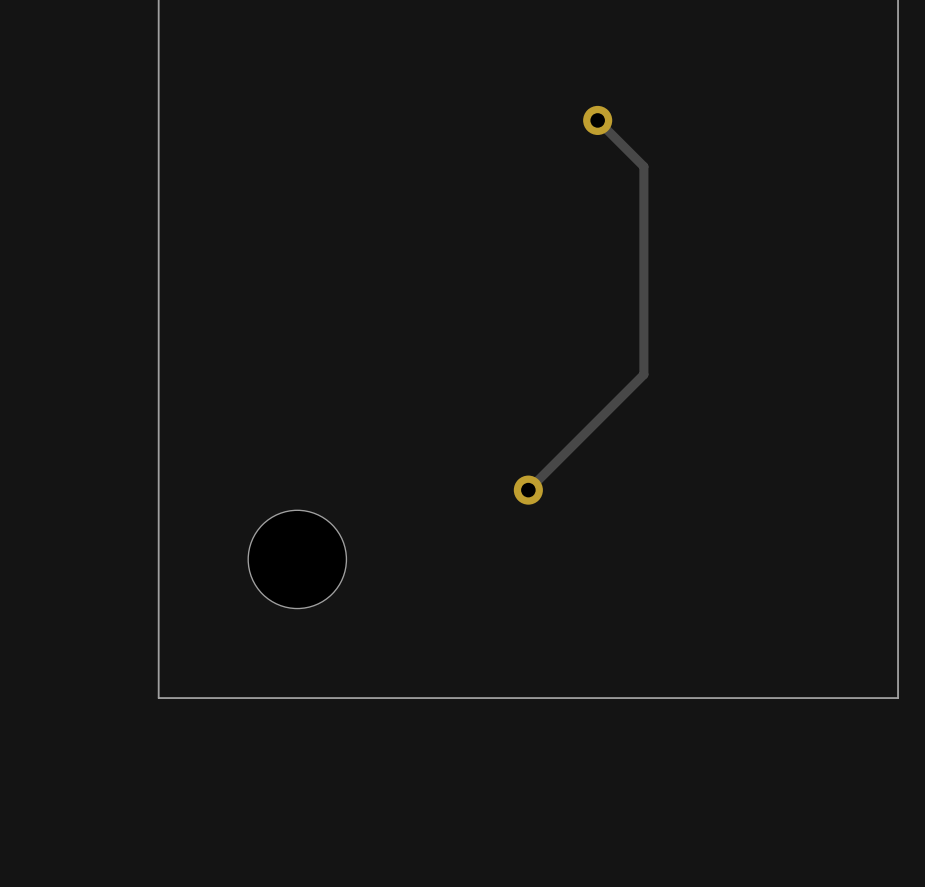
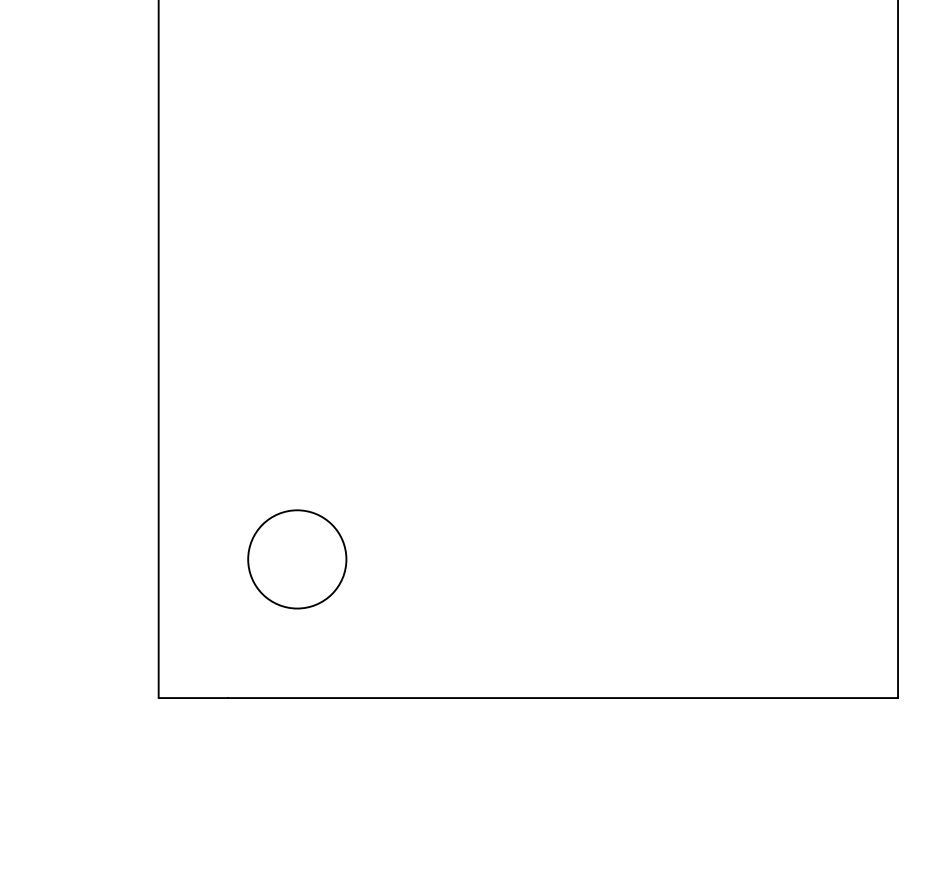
track: (597, 120) (643, 166) (643, 374) (528, 490) -> none
via: (597, 120) -> none
via: (528, 490) -> none

